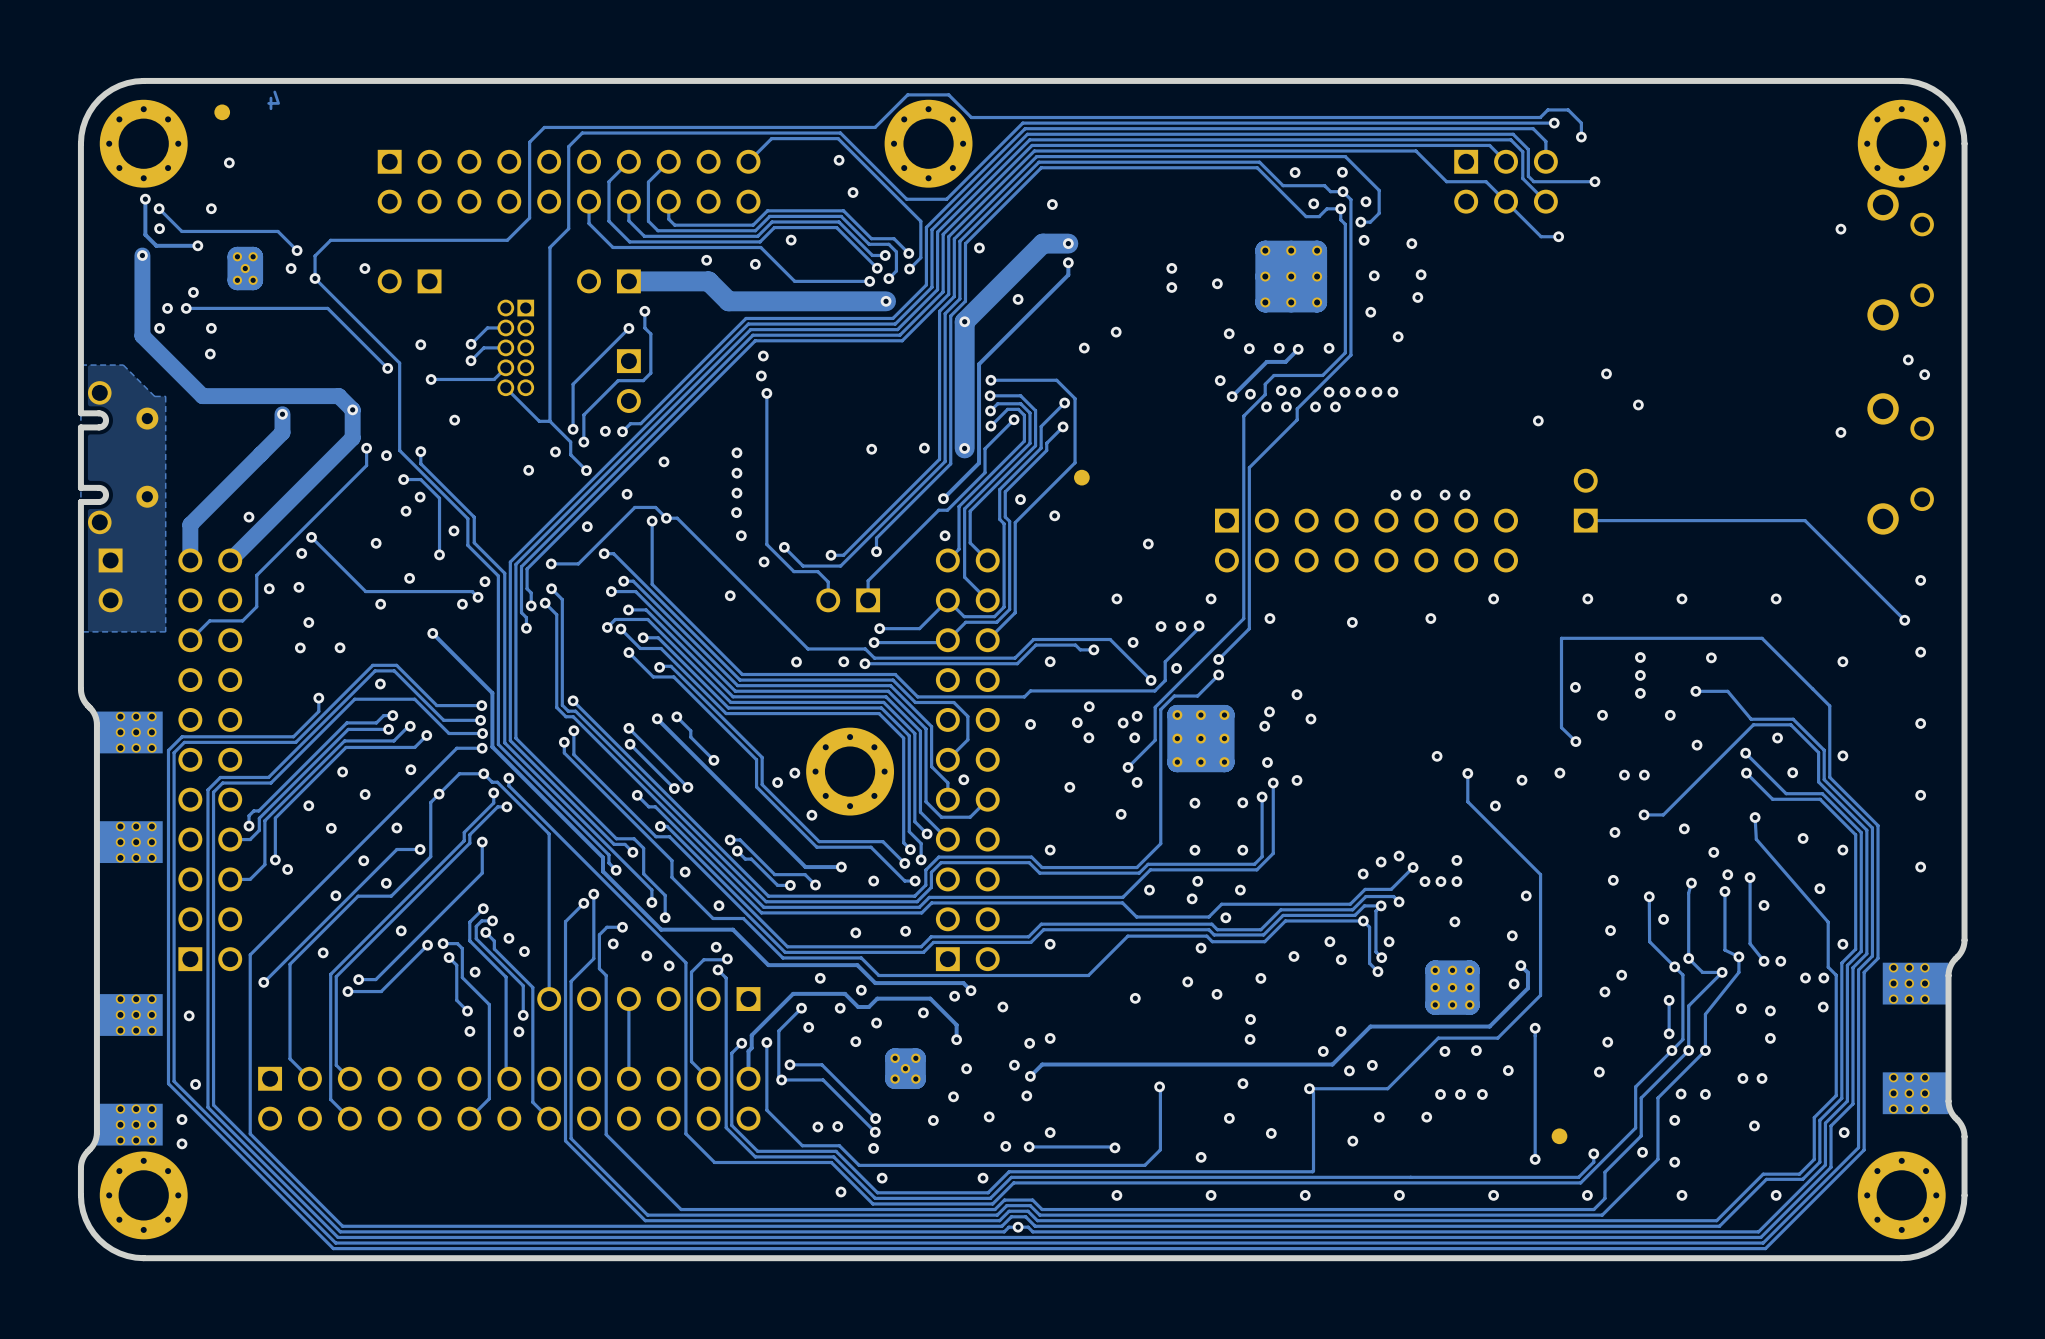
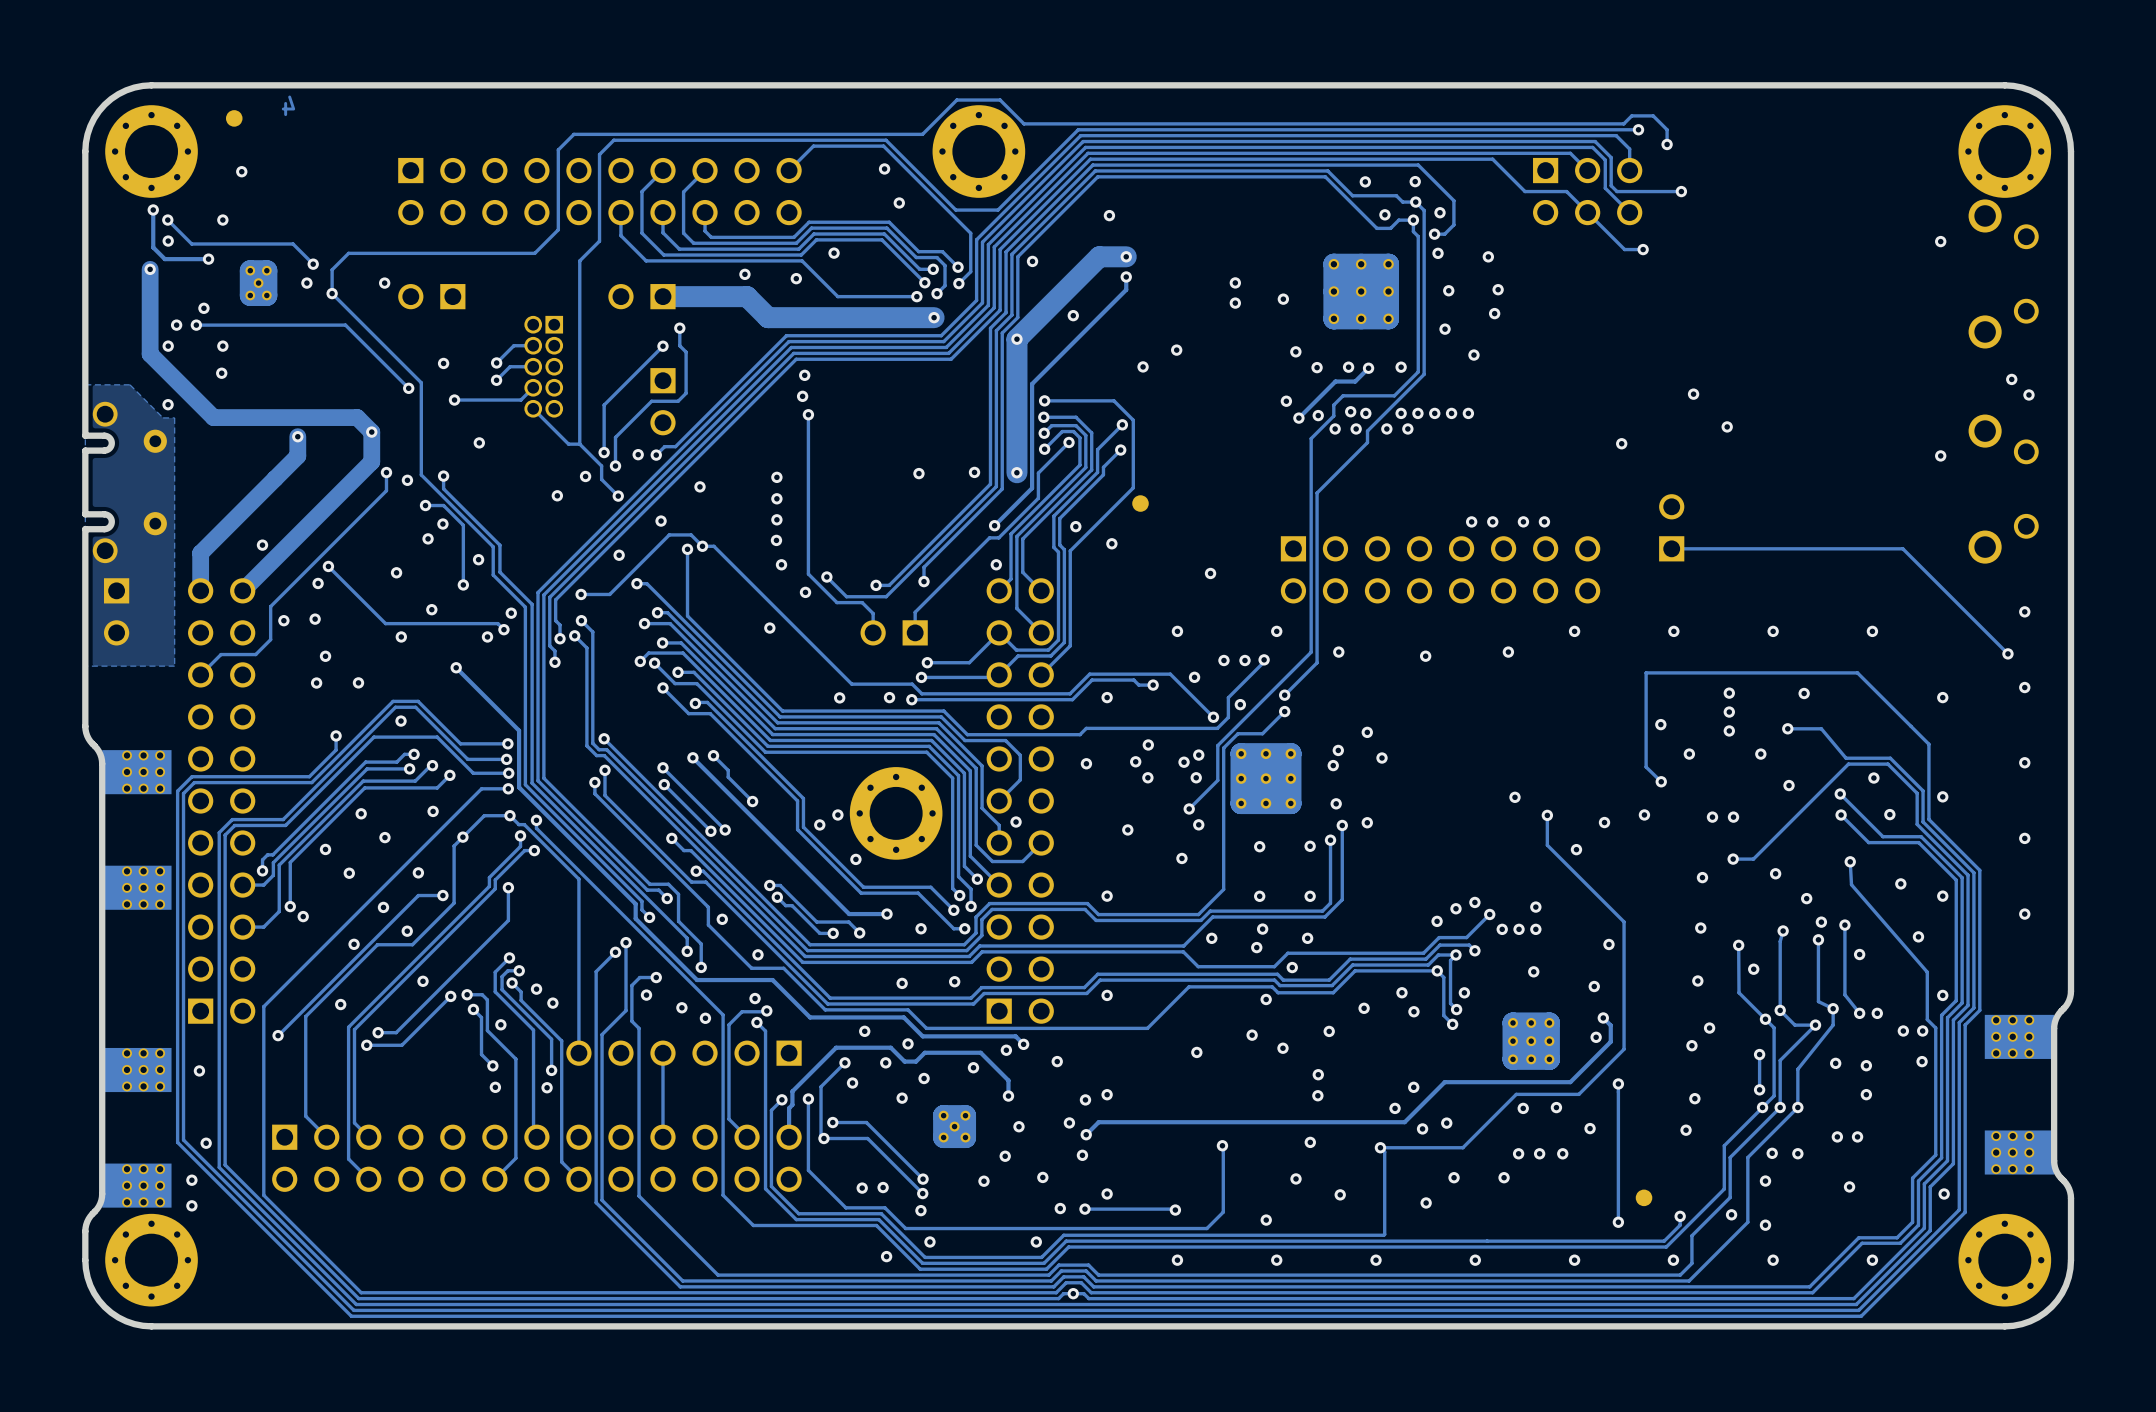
via: none -> (168, 404)

